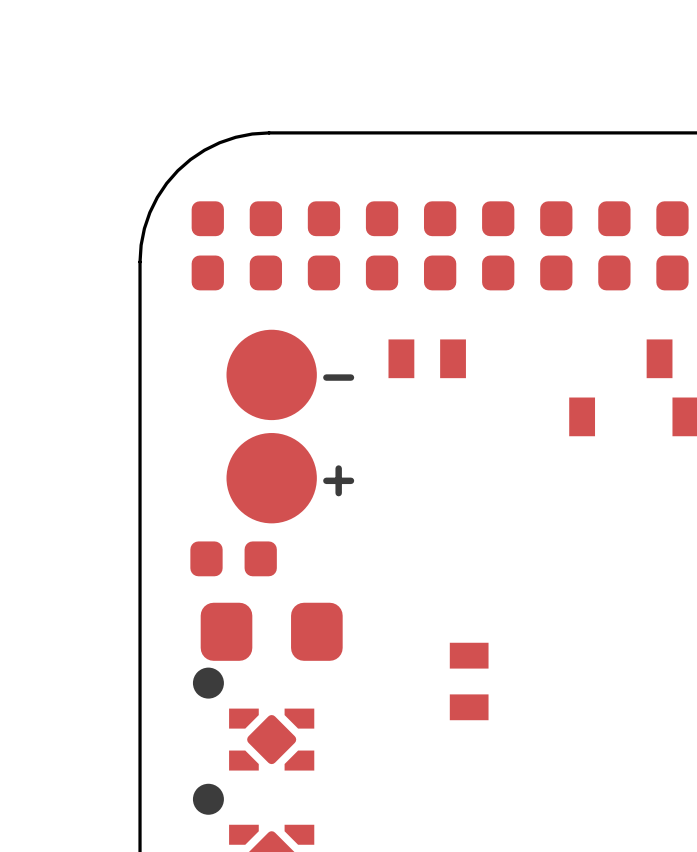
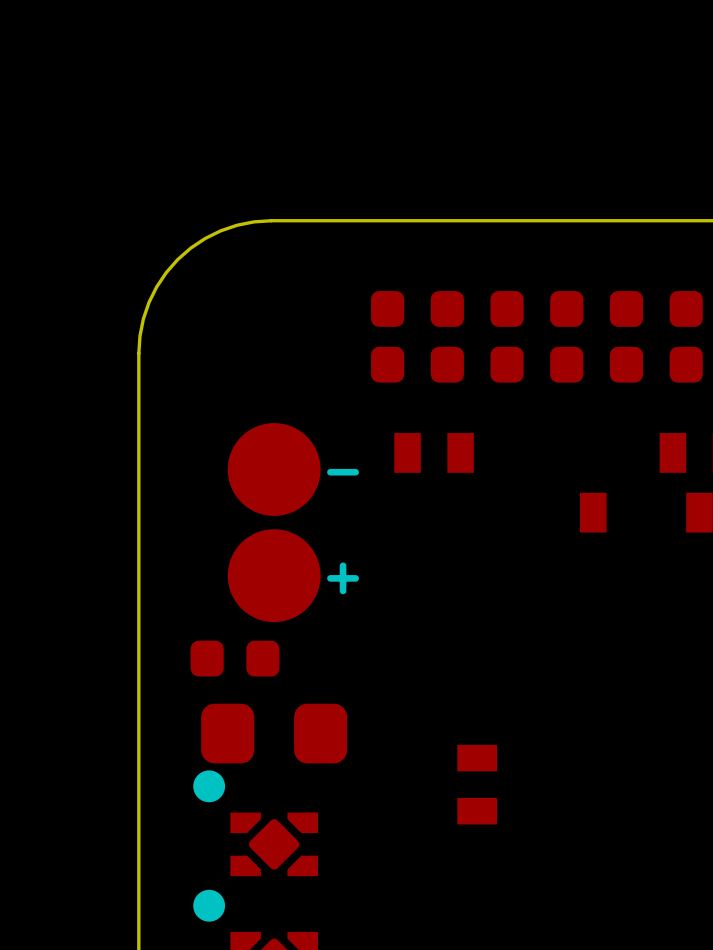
part: (207, 245) -> none
part: (265, 245) -> none
part: (323, 245) -> none

